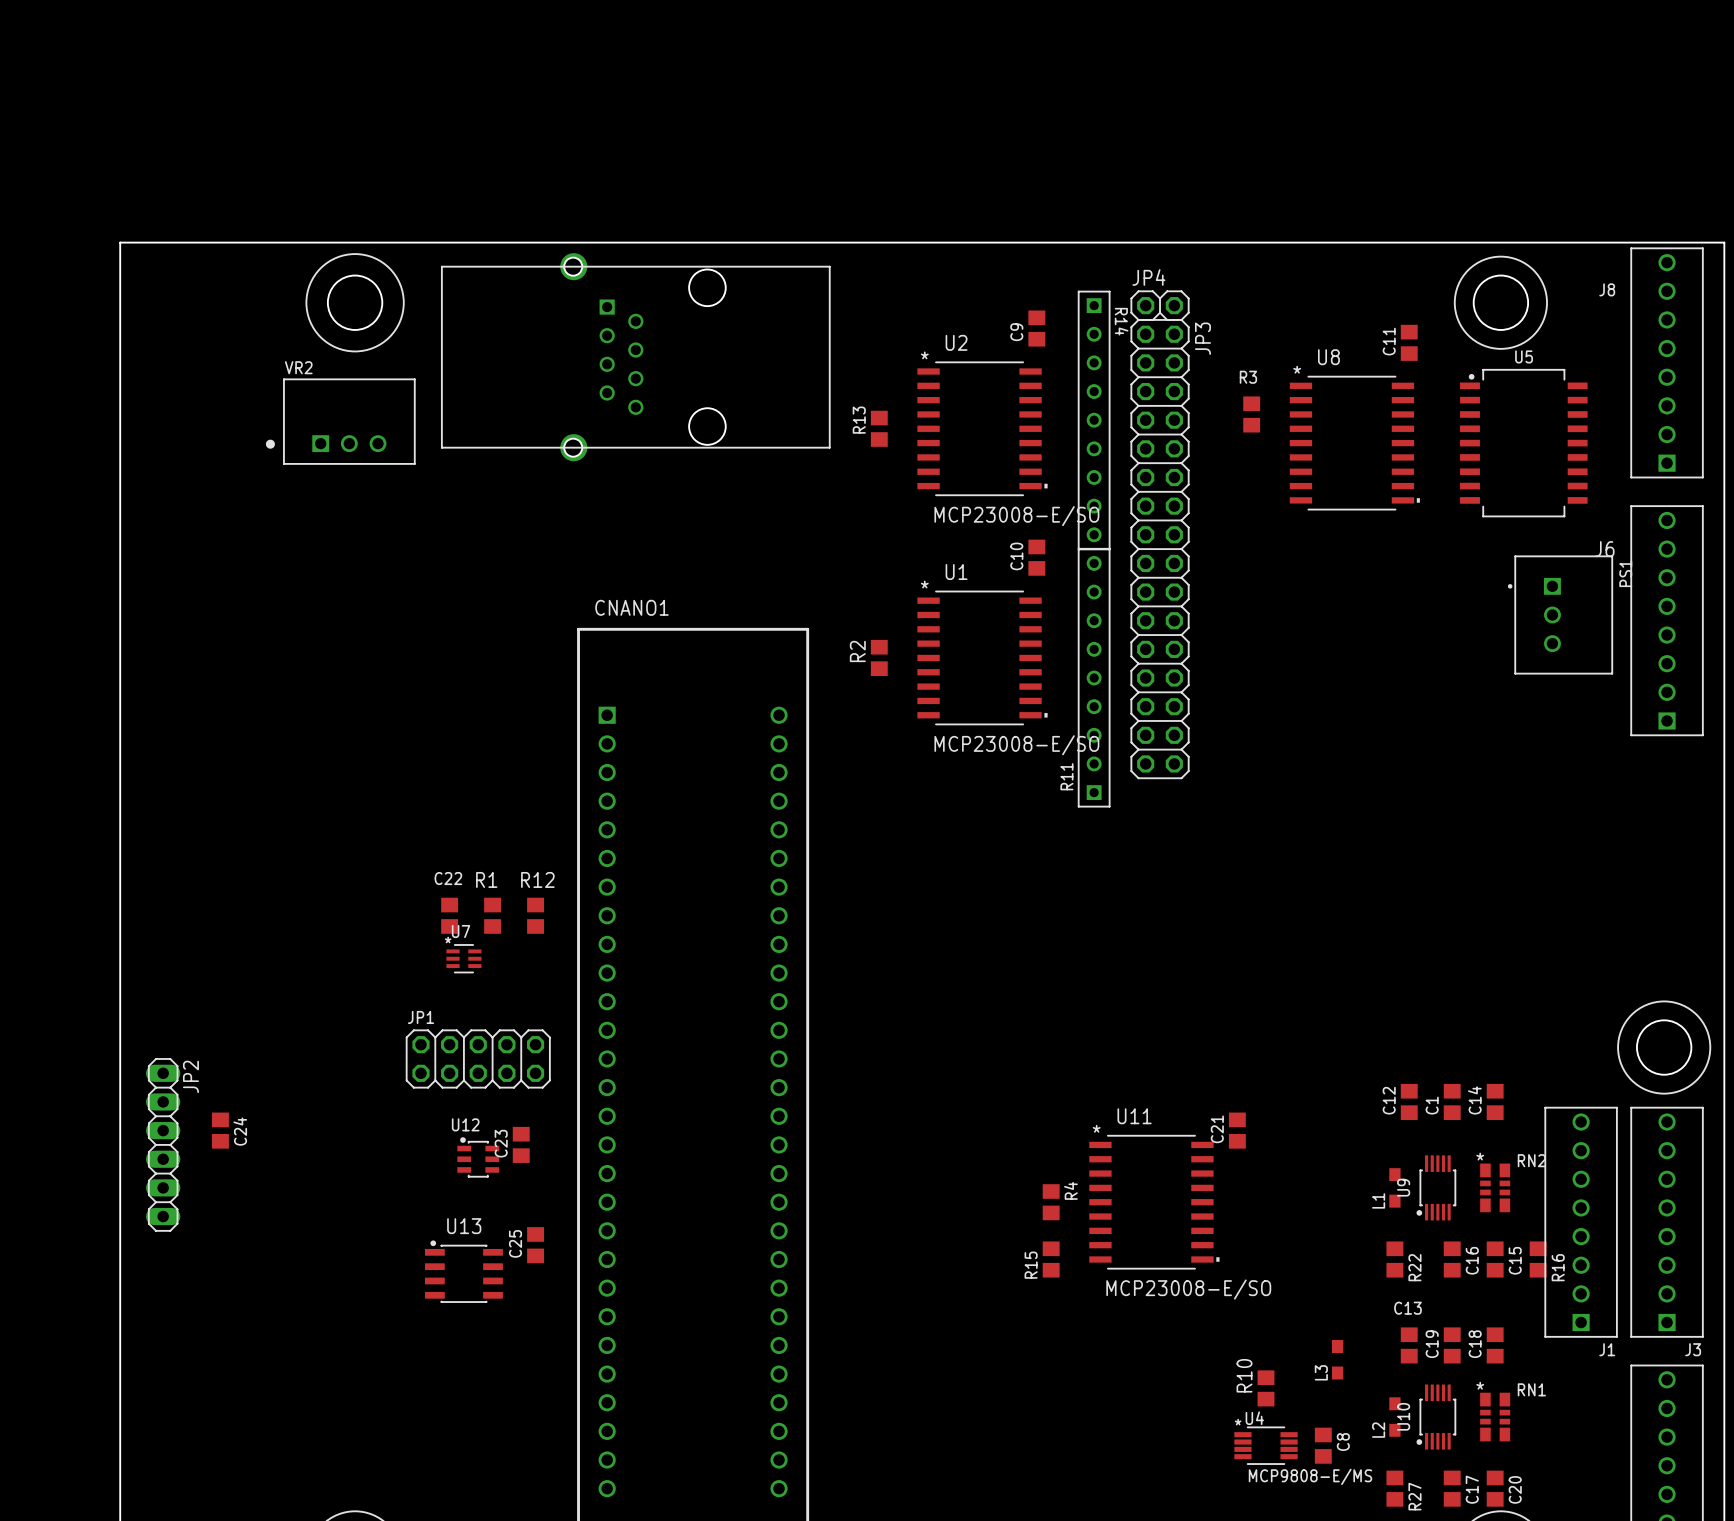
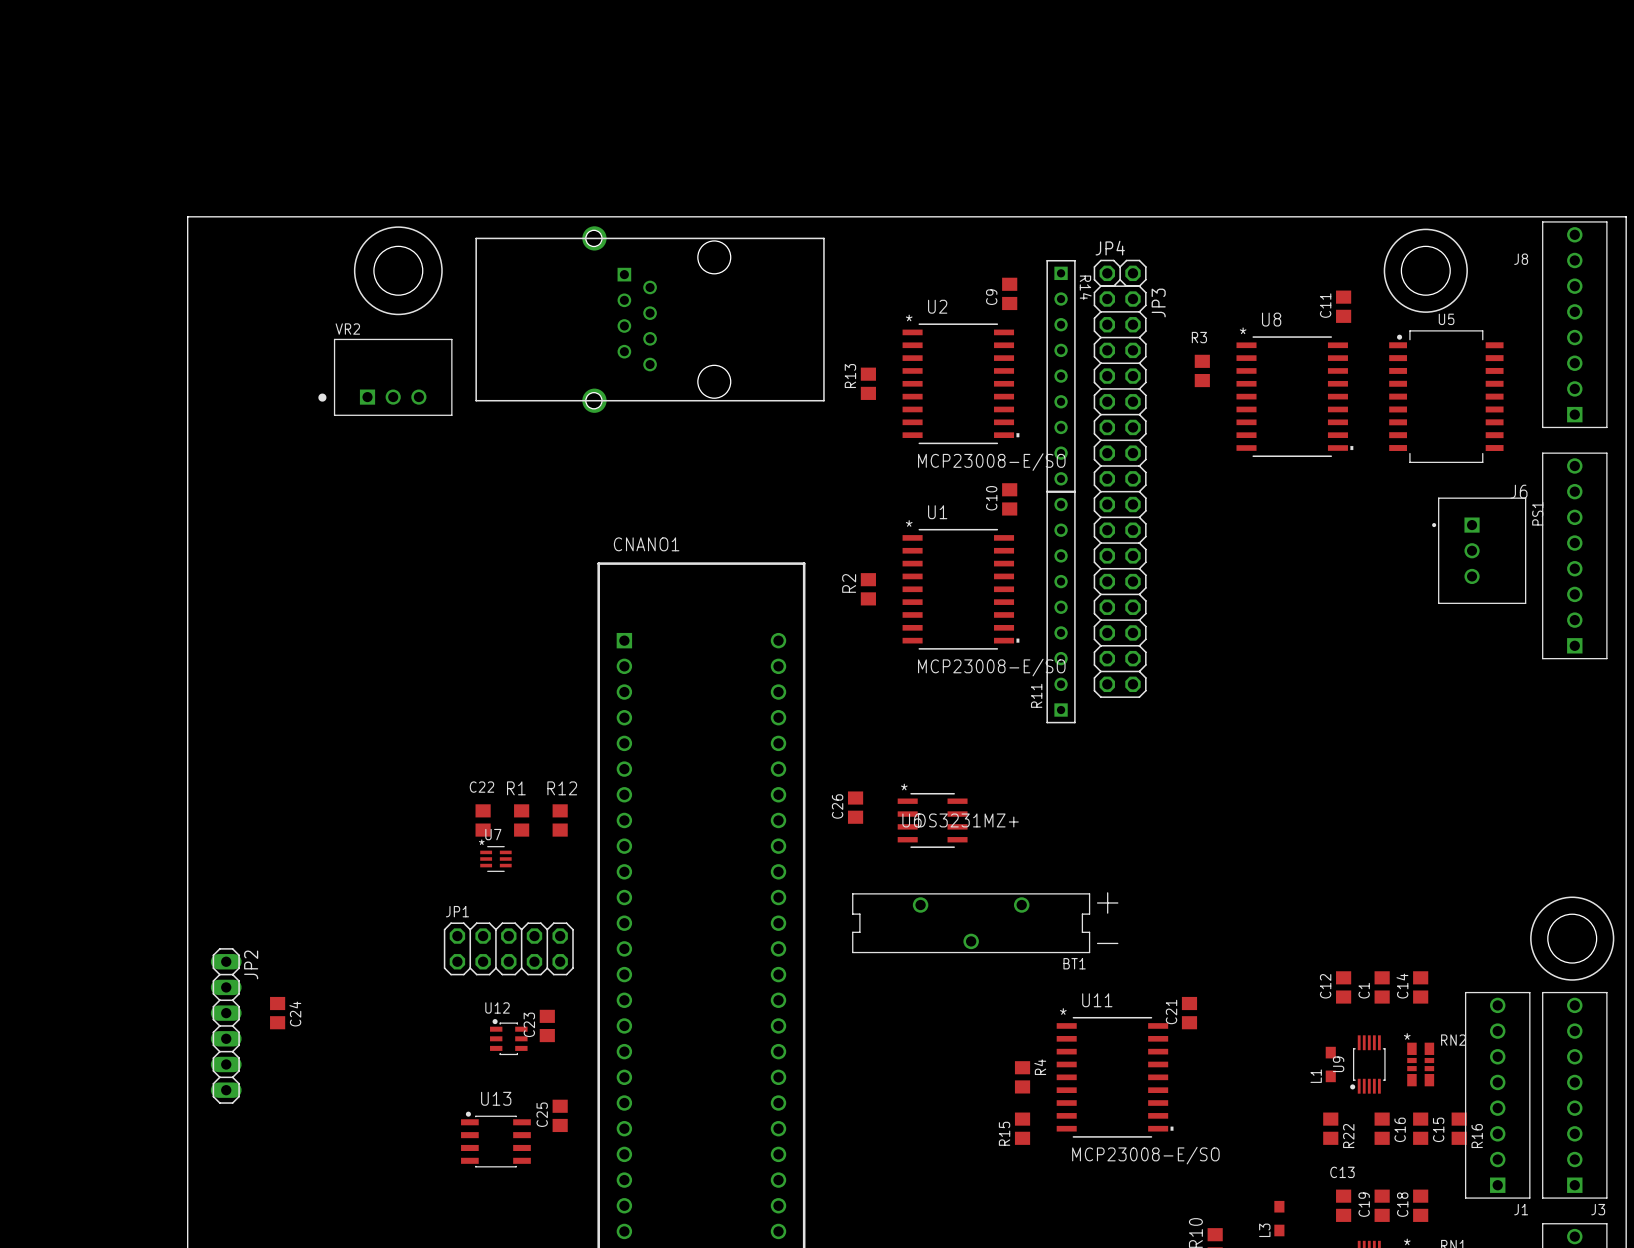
C26: none -> (855, 807)
U6: none -> DS3231MZ+ (932, 820)
BT1: none -> (985, 922)

